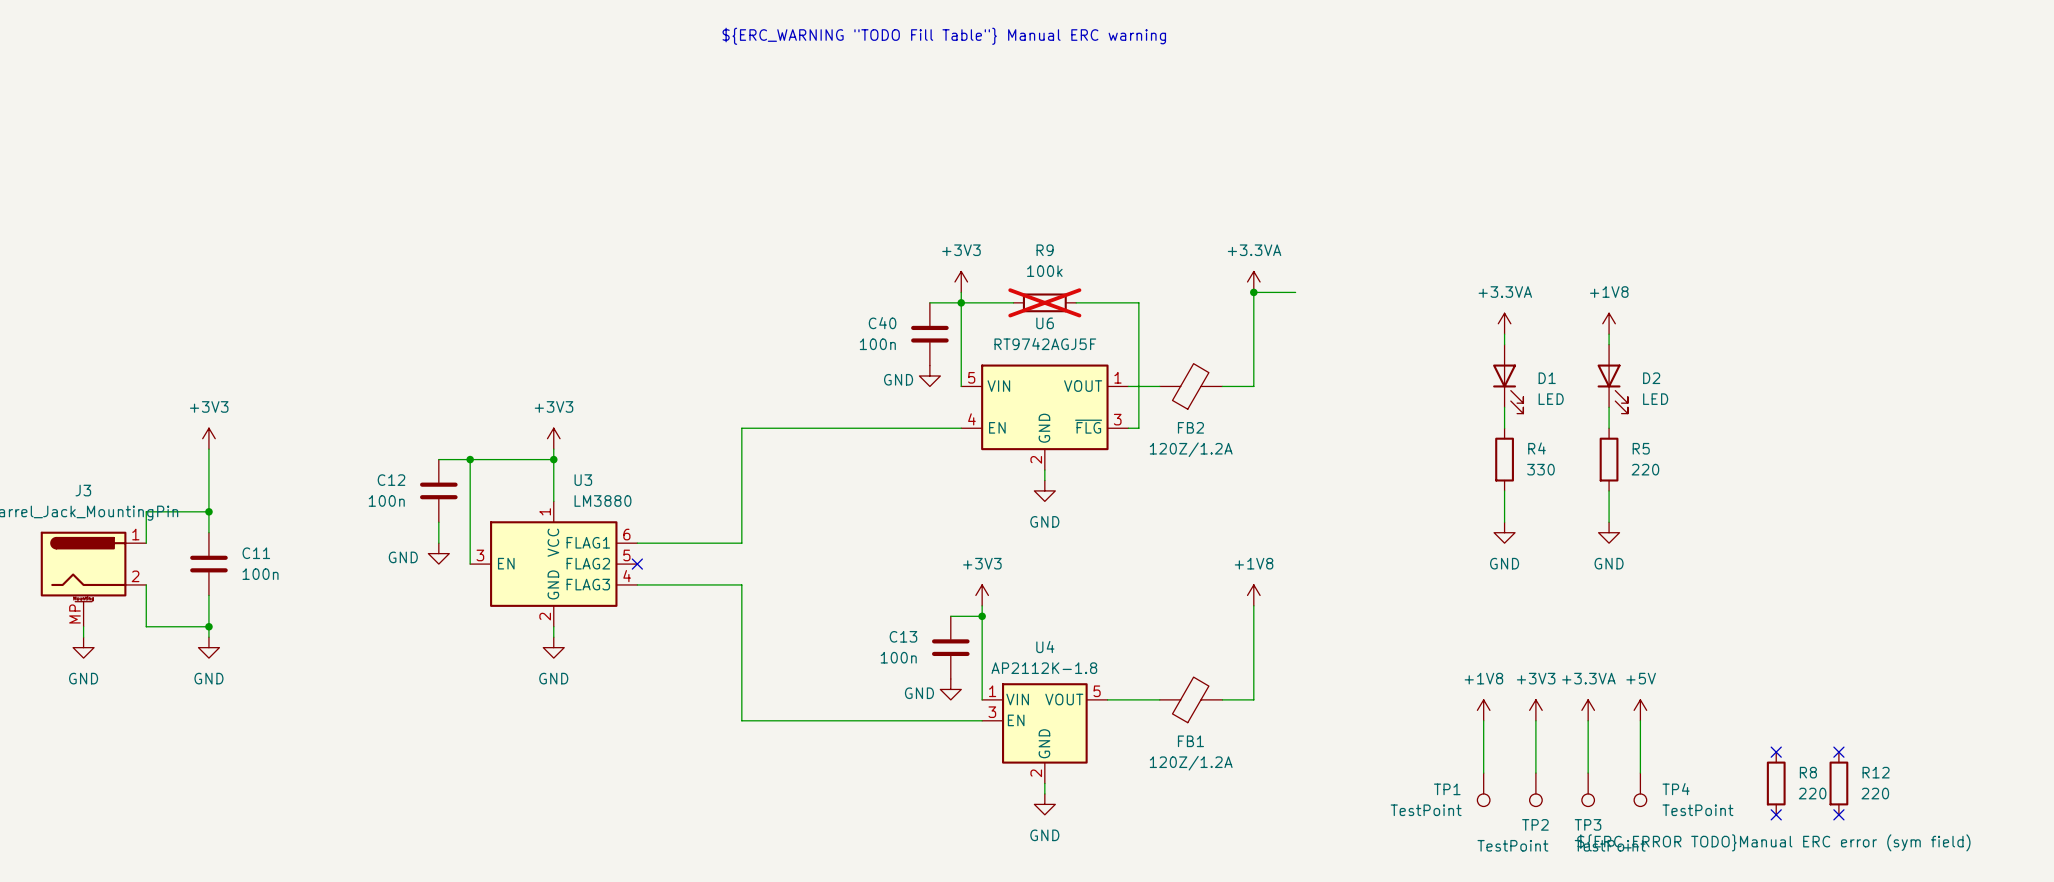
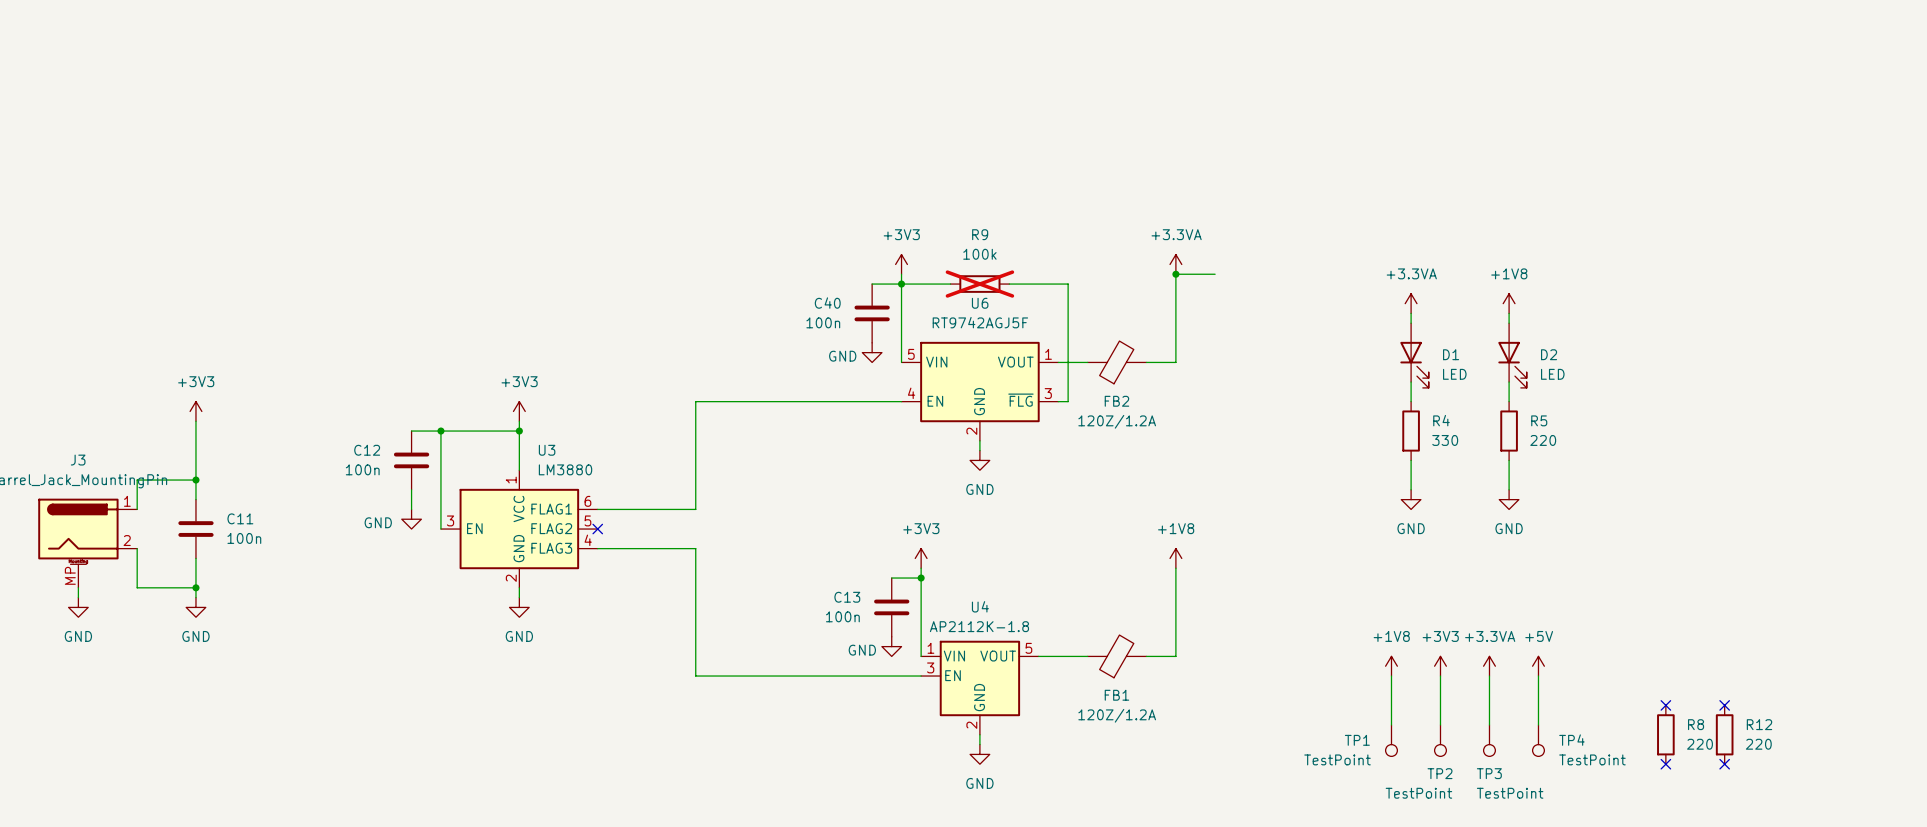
text: ${ERC_WARNING "TODO Fill Table"} Manual ERC warning (944, 36) -> none
R8 text: ${ERC_ERROR TODO}Manual ERC error (sym field) (1773, 842) -> none

